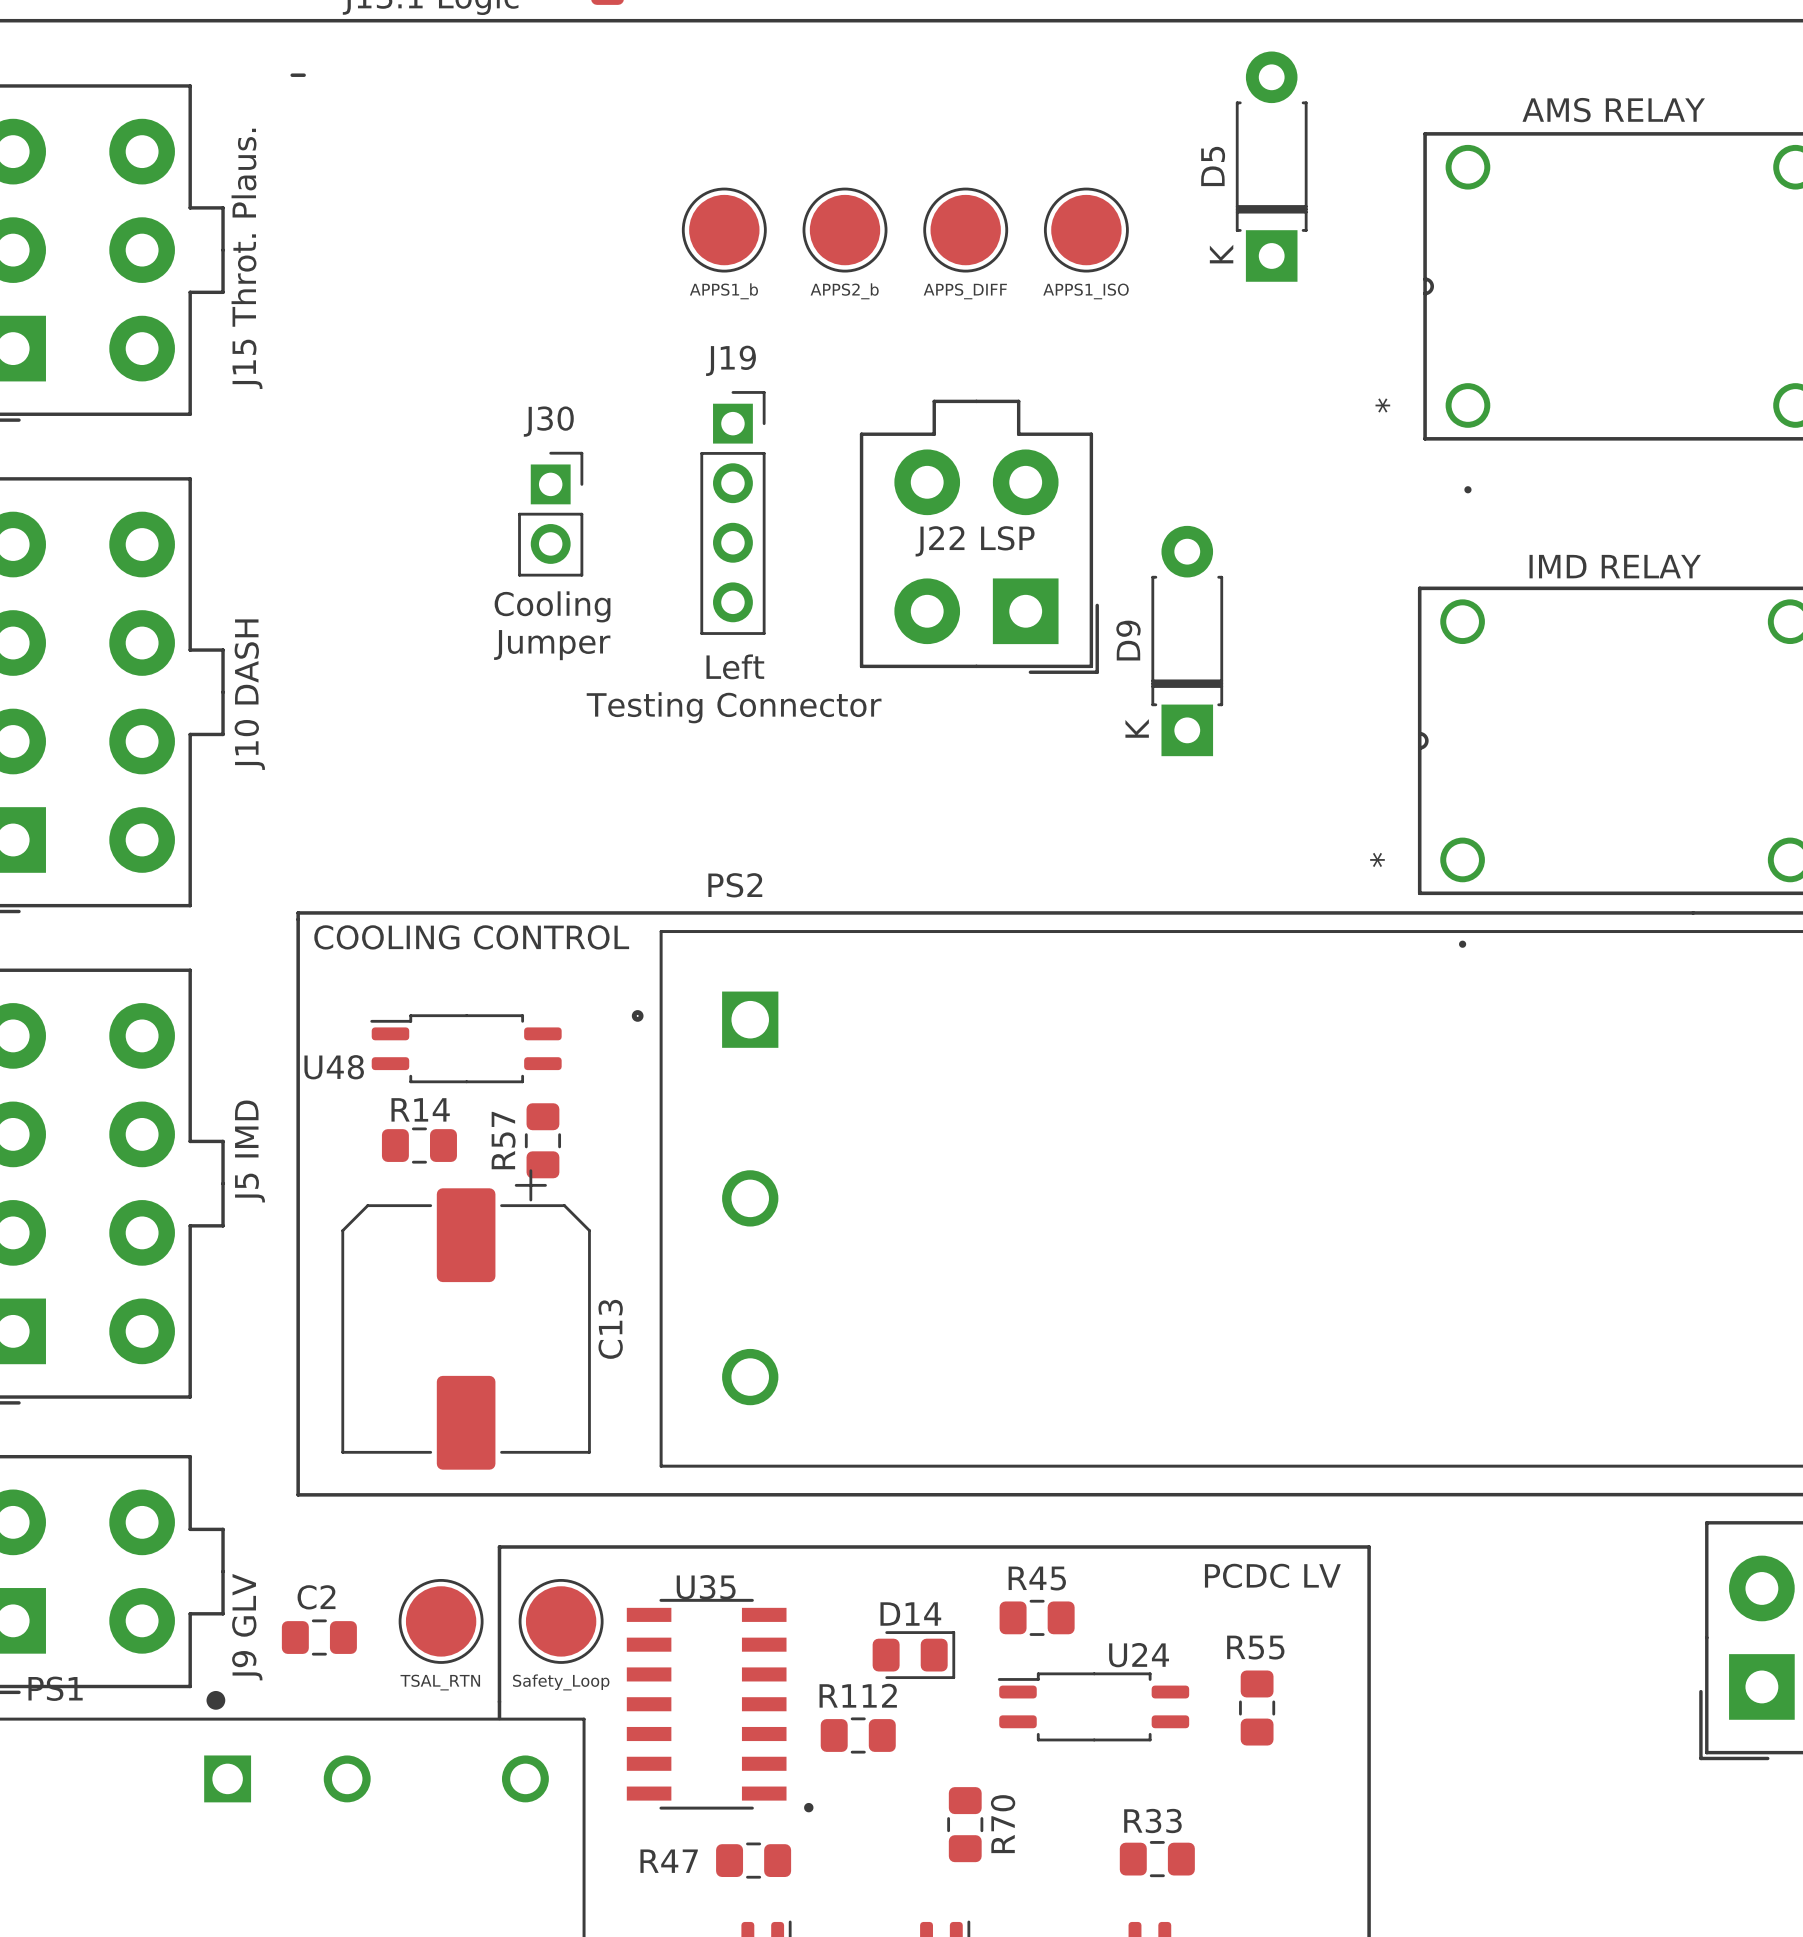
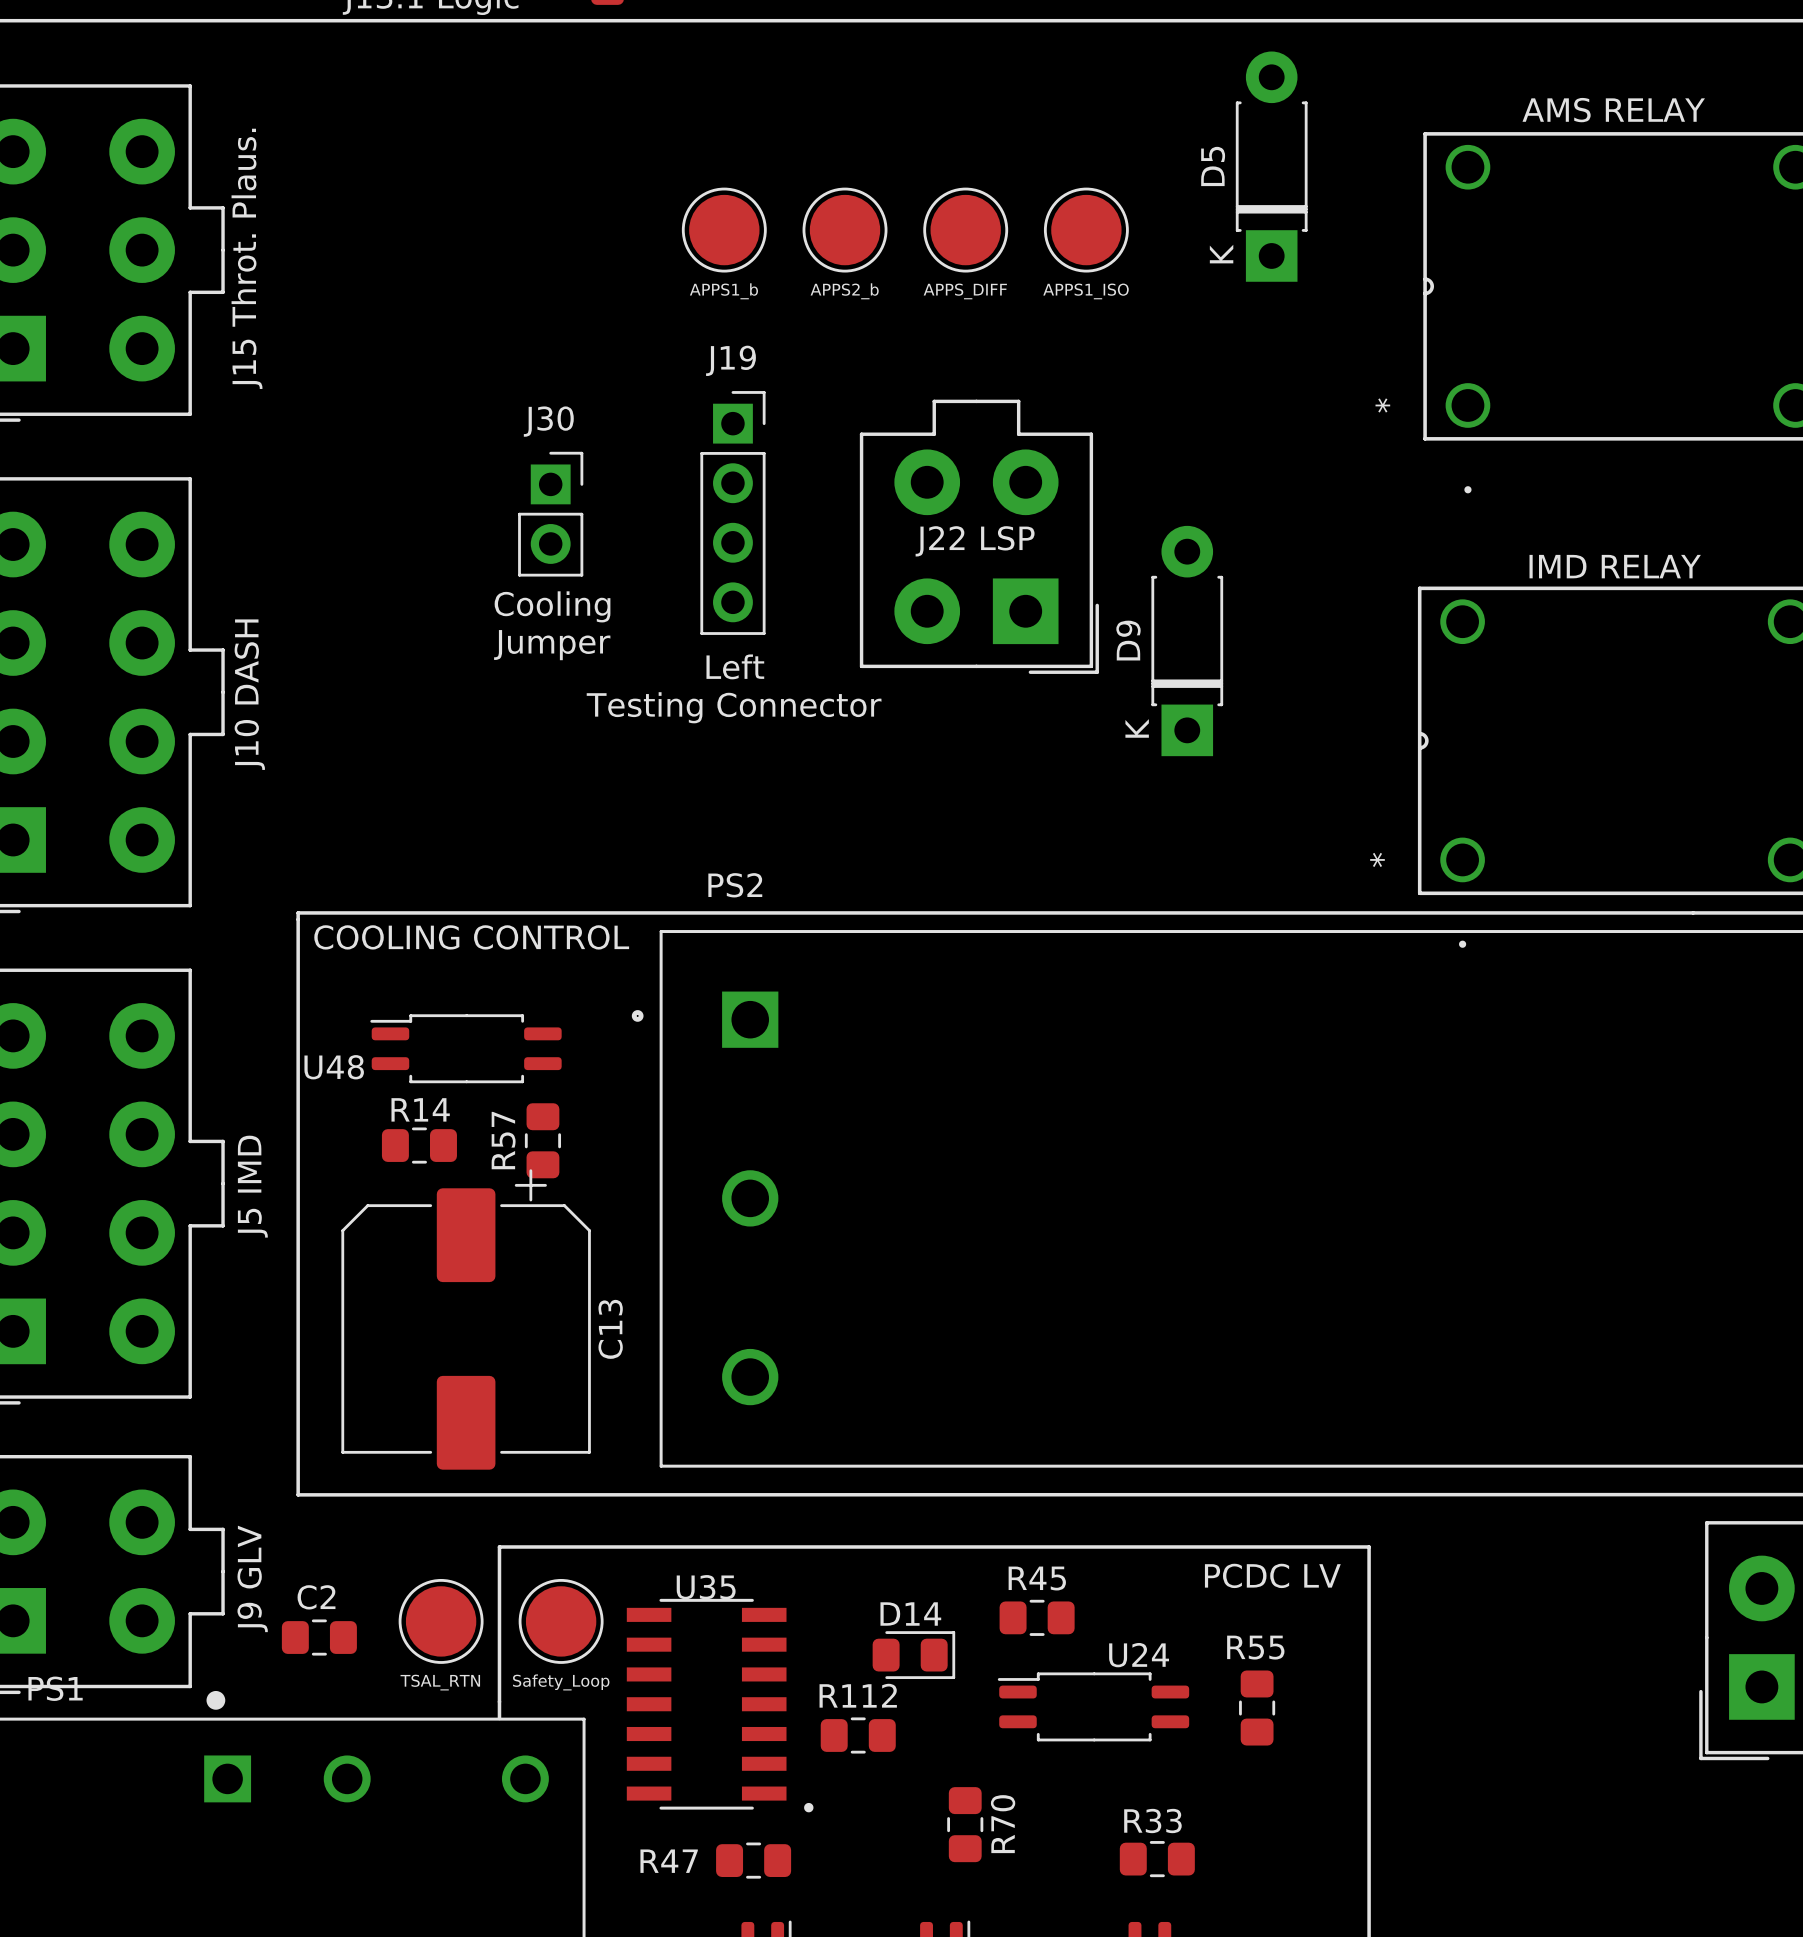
line: (292, 75) (304, 75) -> none
J5 IMD name position: J5 IMD (249, 1151) -> J5 IMD (252, 1186)
J9 GLV name position: J9 GLV (247, 1627) -> J9 GLV (252, 1578)

